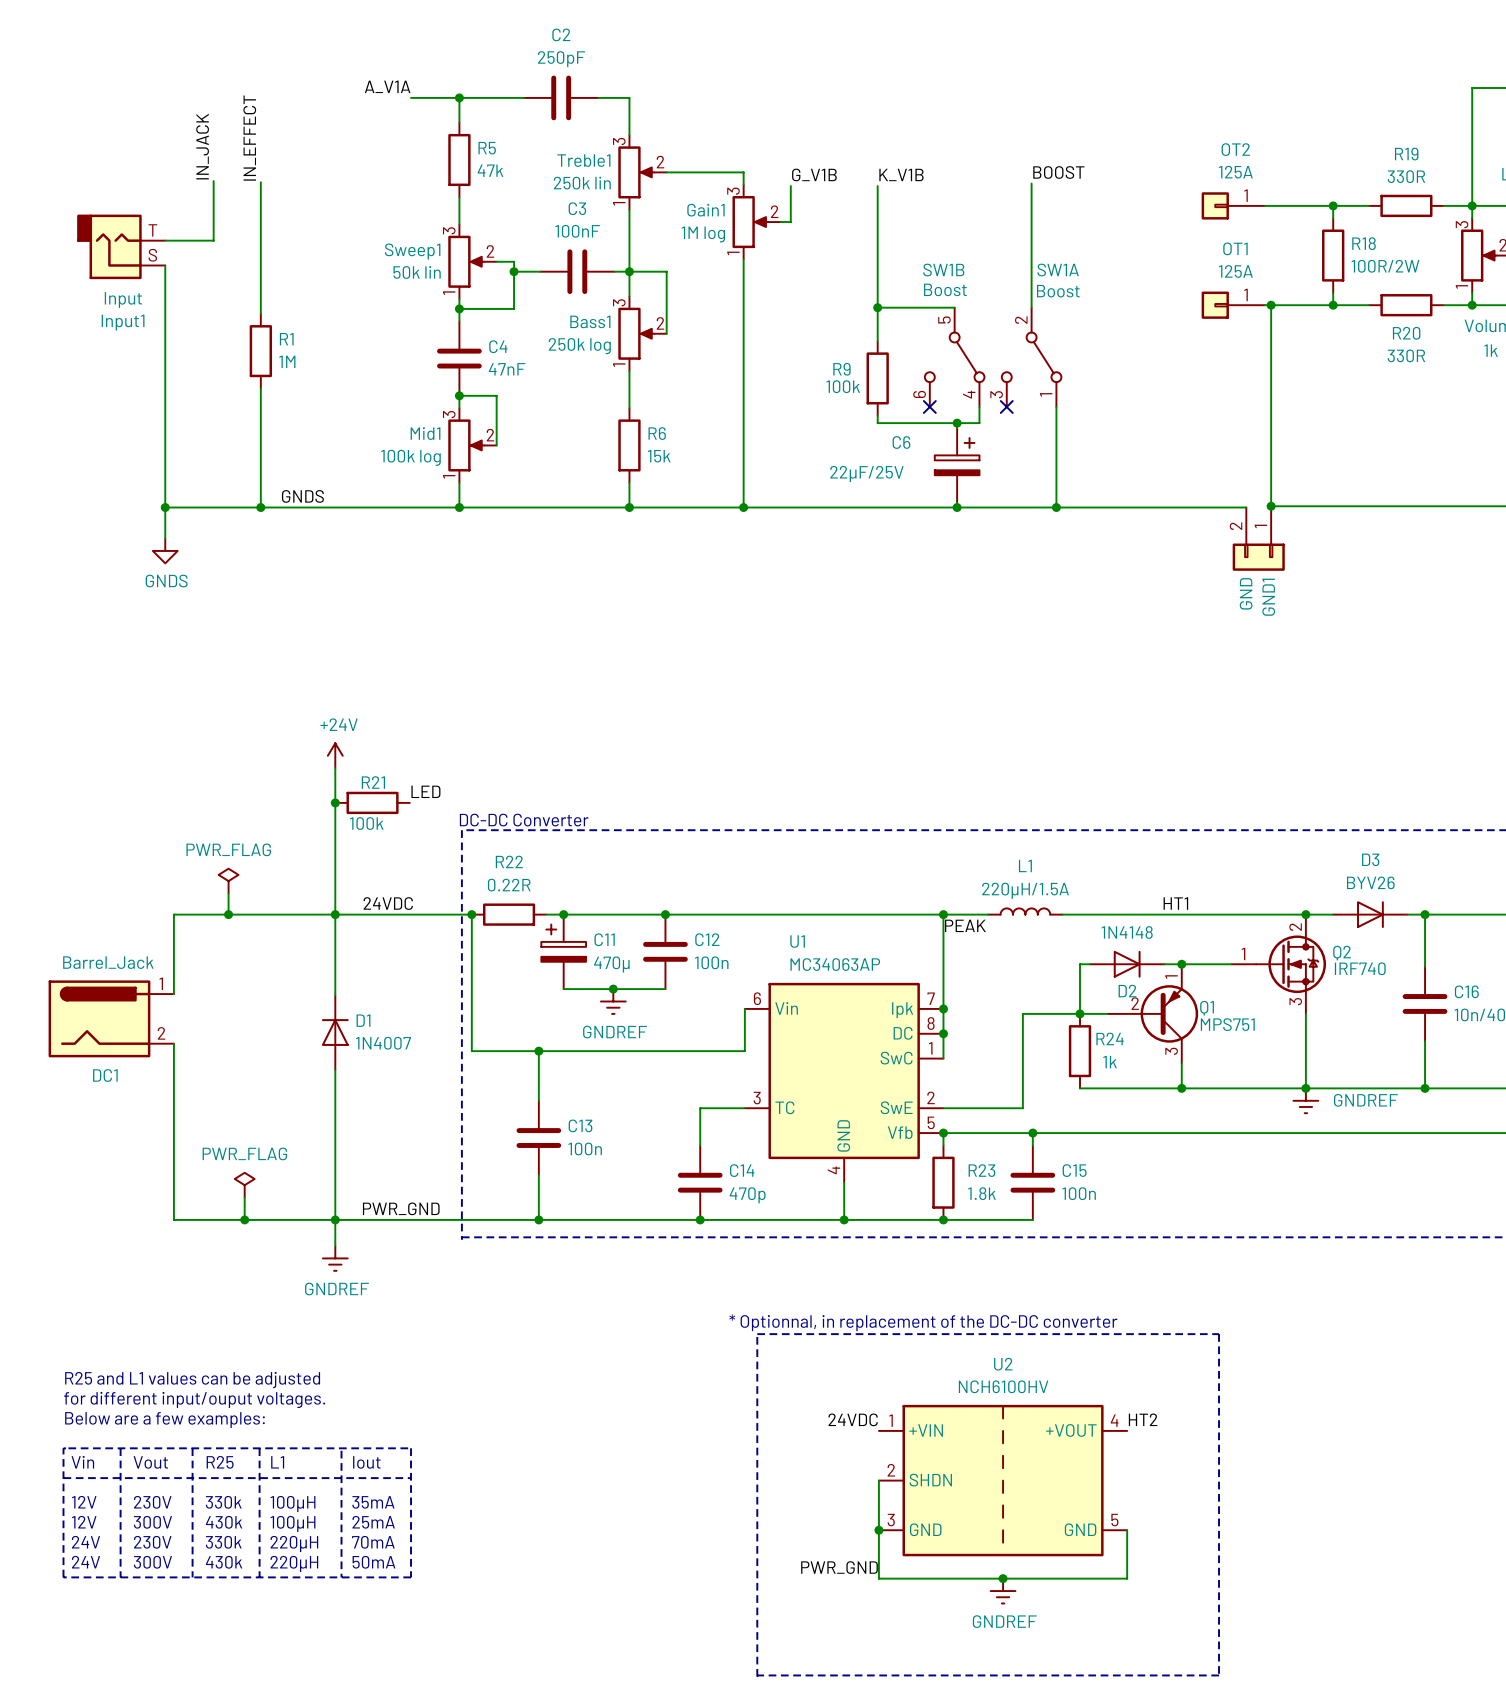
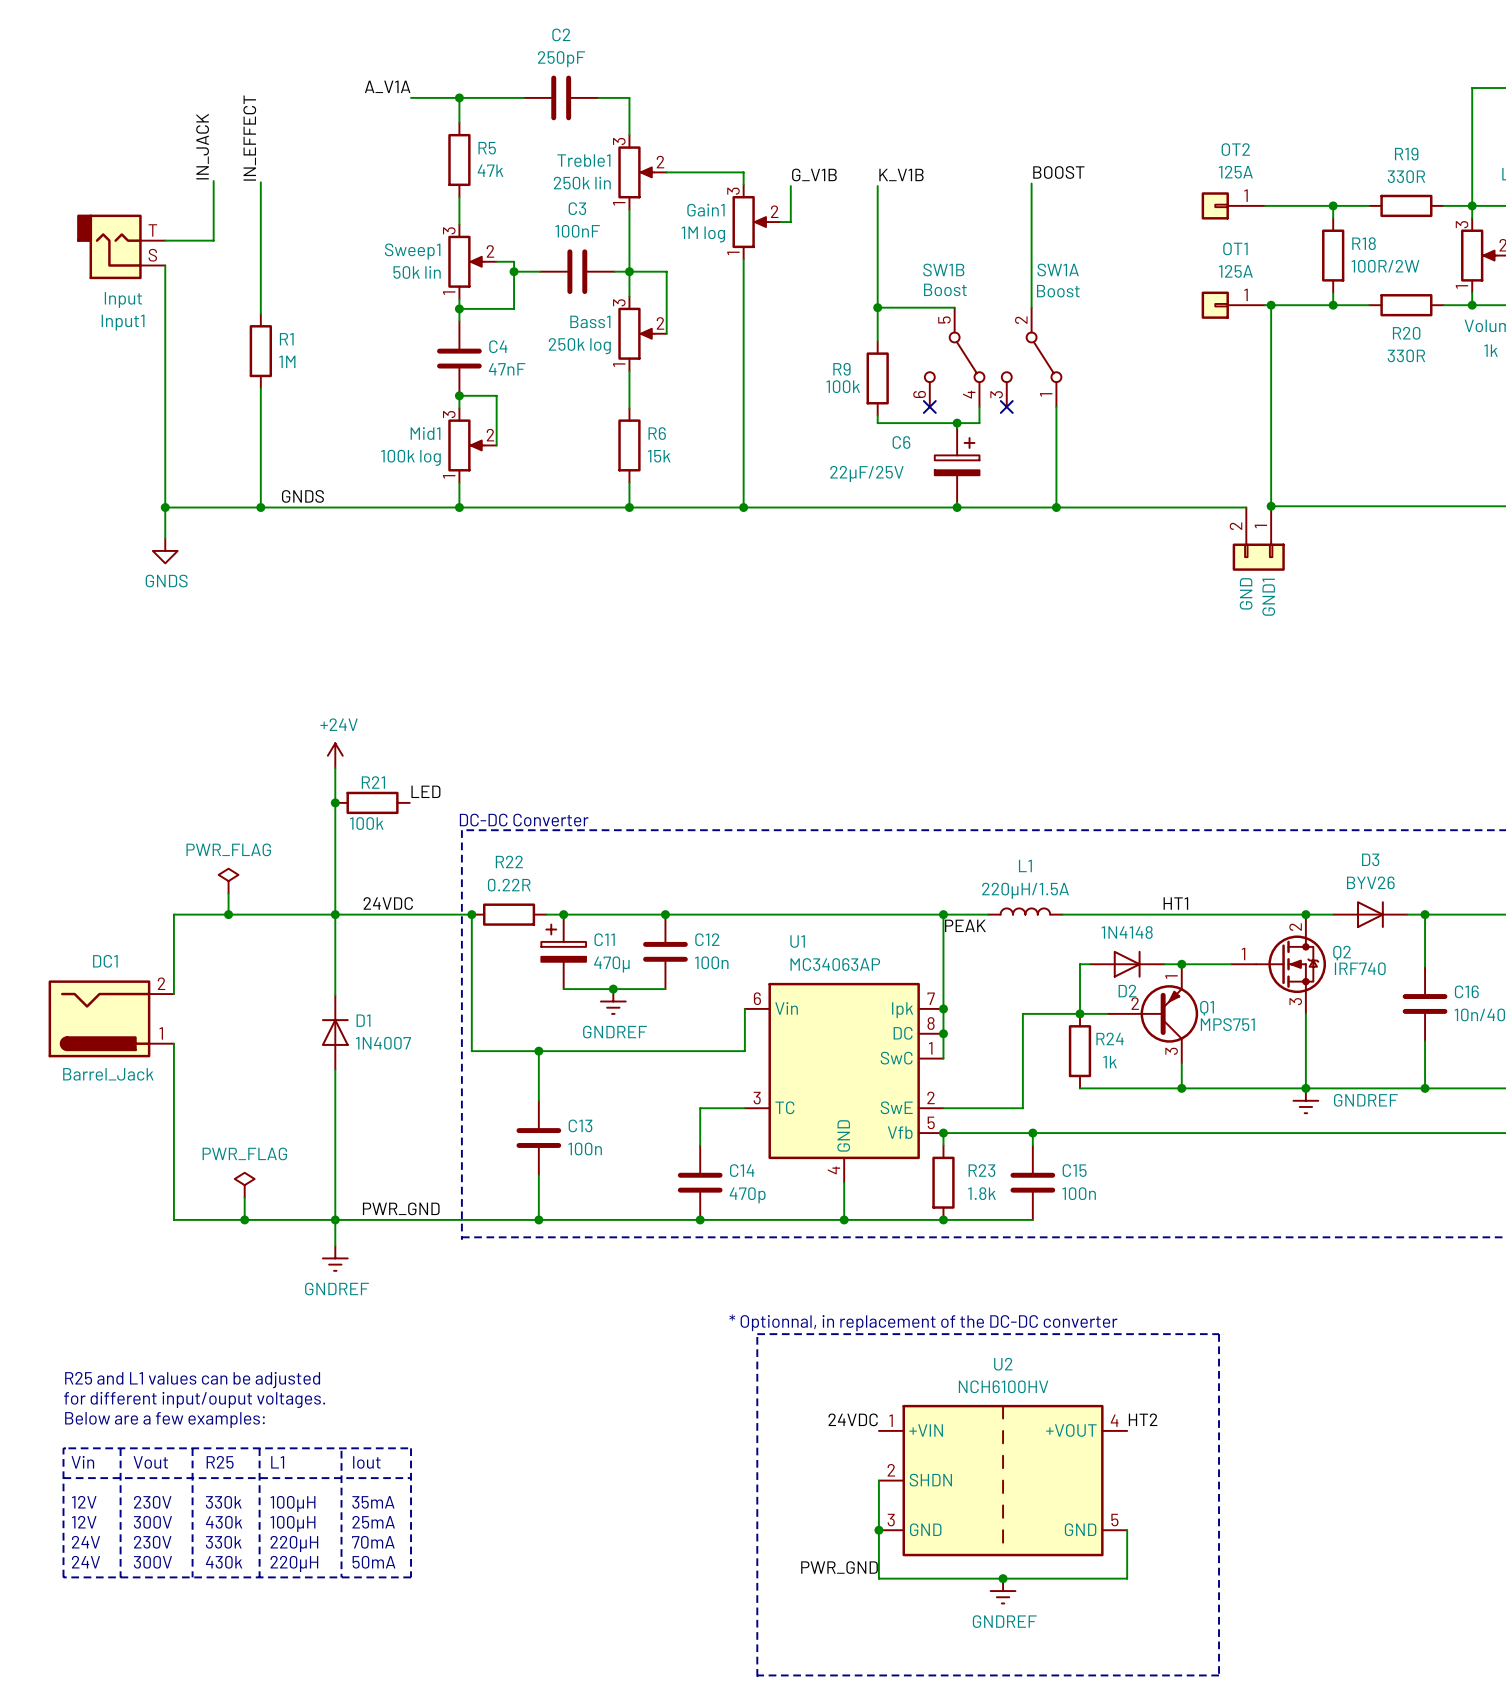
DC1 flip: as is (99, 1018) -> up-down (99, 1018)

